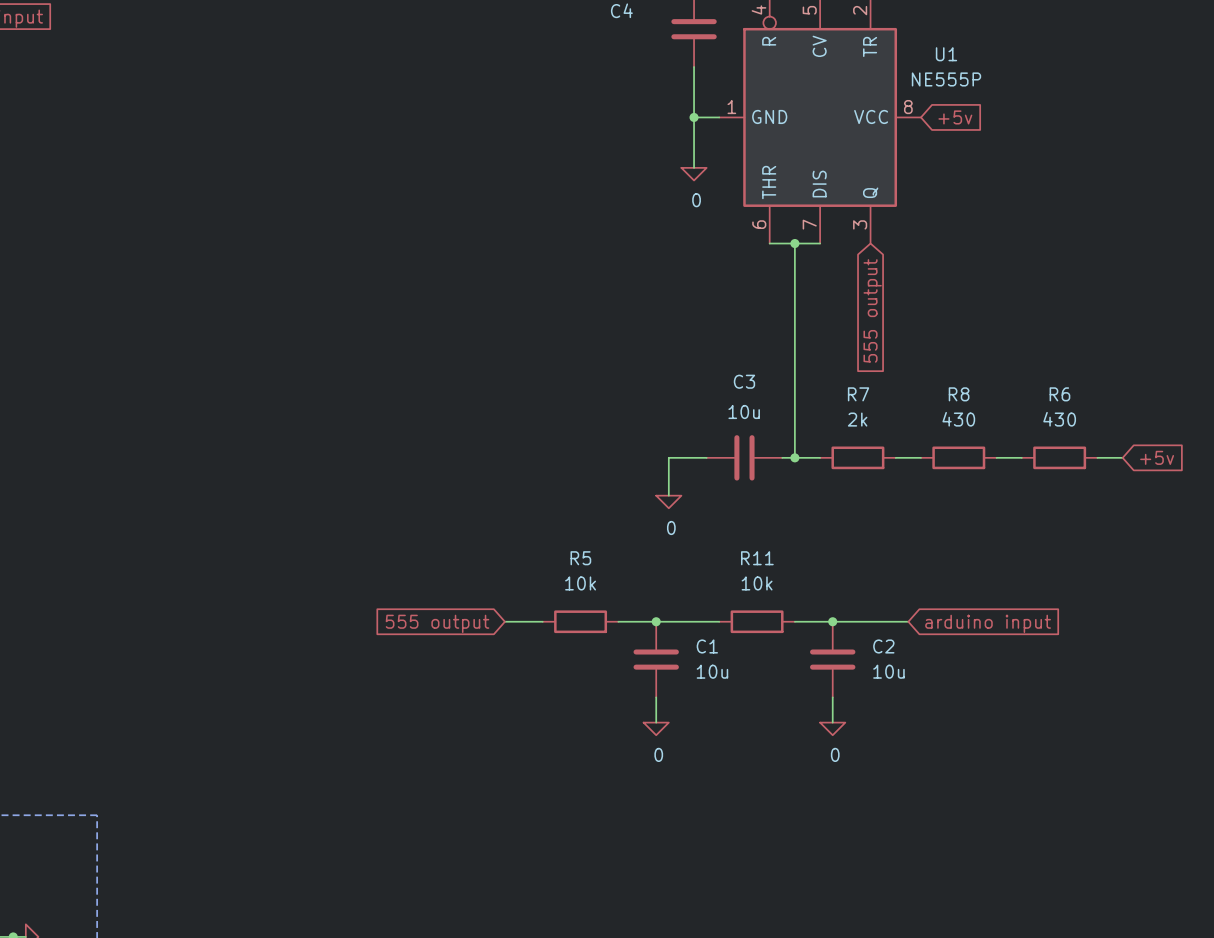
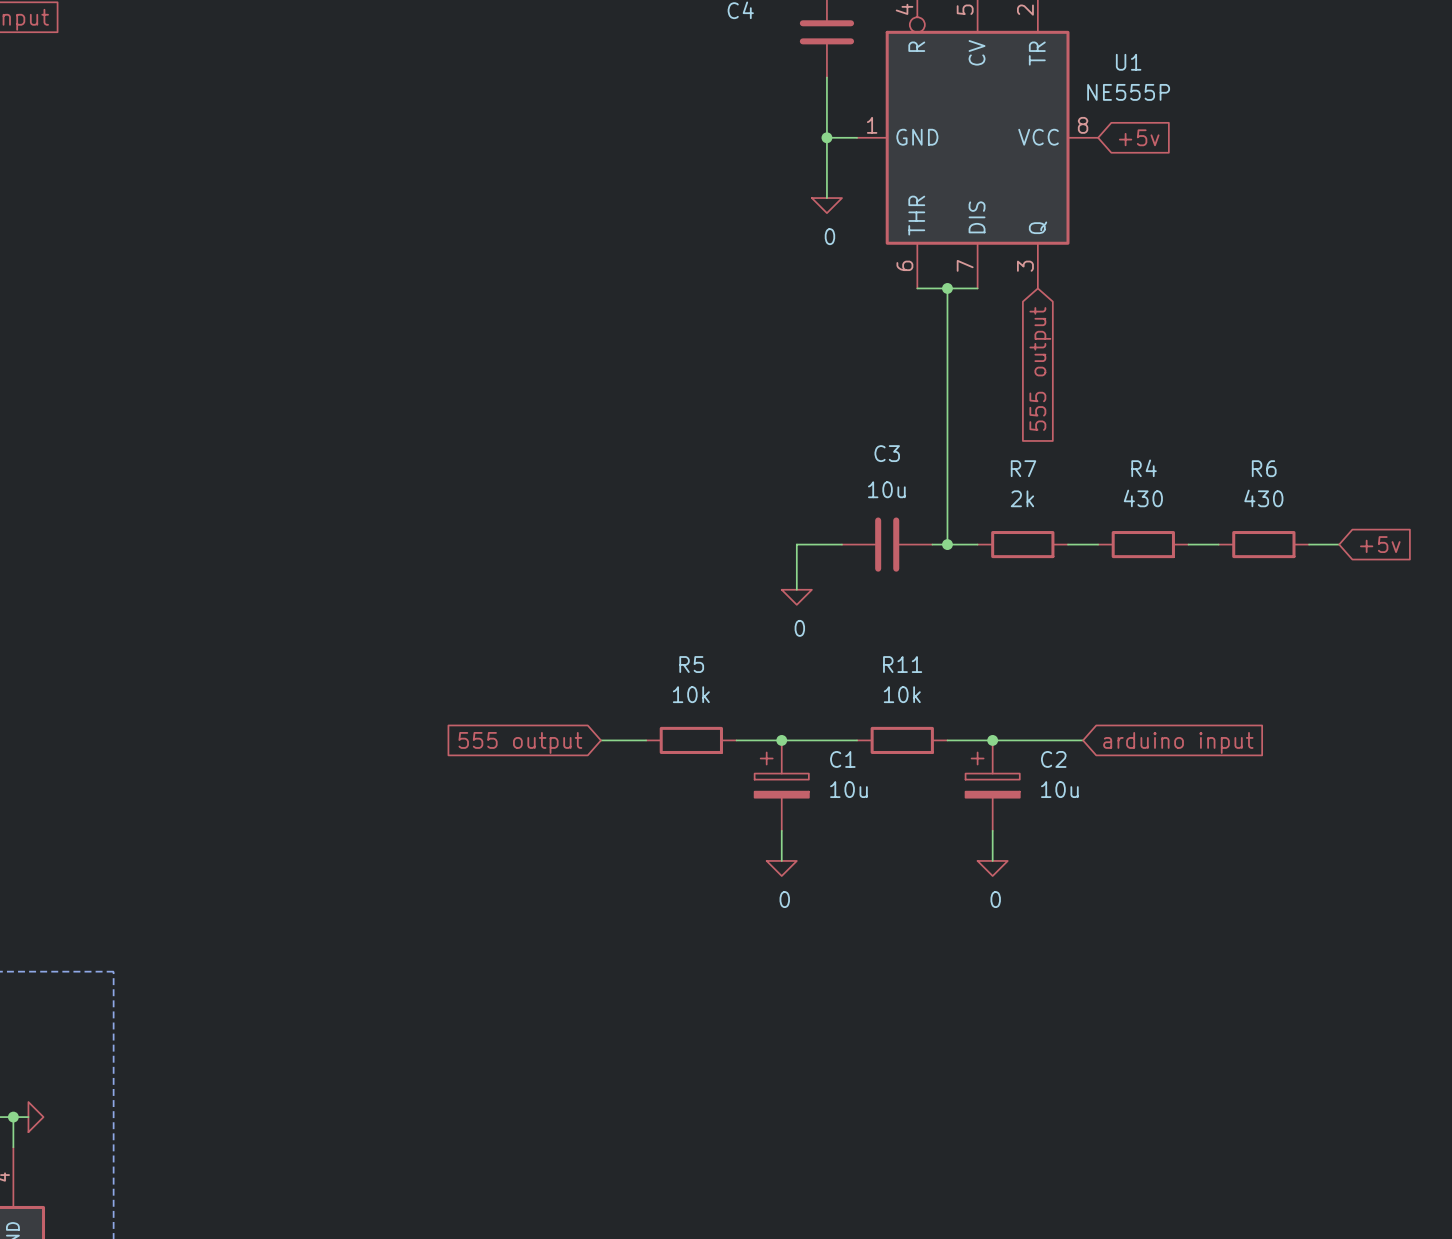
R8 name: R8 (959, 394) -> R4 (1144, 468)
C1 symbol: [633, 621, 679, 698] -> [754, 740, 809, 831]
C2 symbol: [810, 621, 856, 698] -> [965, 740, 1020, 831]

